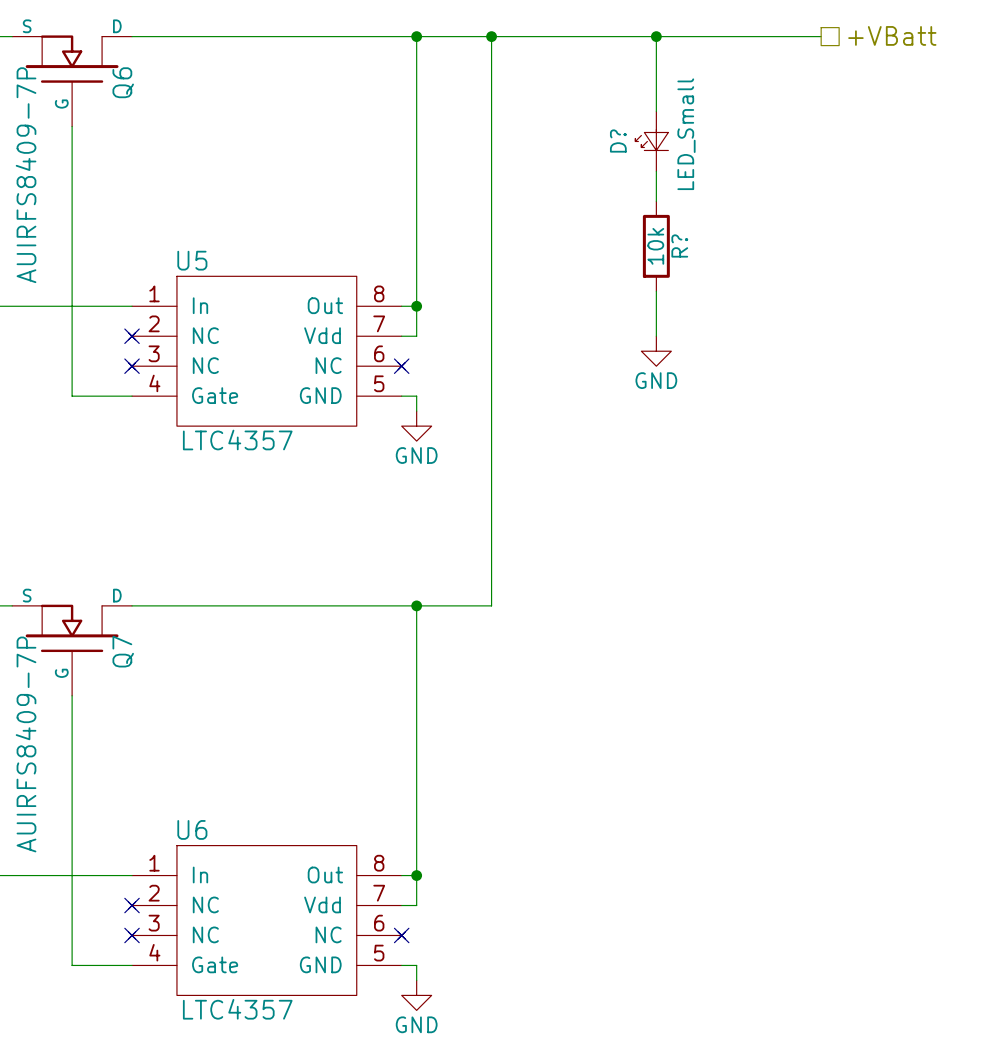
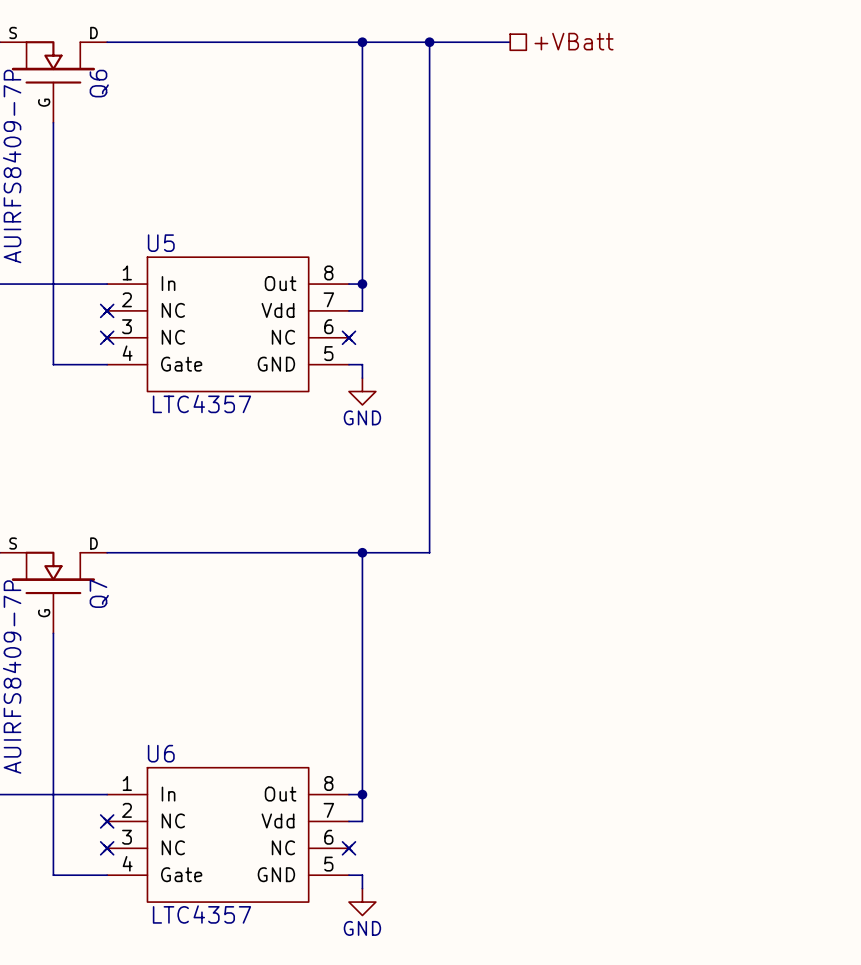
hierarchical label position: +VBatt (892, 35) -> +VBatt (574, 41)
wire: (581, 36) (821, 36) -> none
wire: (656, 36) (656, 111) -> none
junction: (656, 36) -> none
D?: LED_Small (651, 141) -> none
wire: (656, 171) (656, 201) -> none
R?: 10k (656, 246) -> none
wire: (656, 291) (656, 336) -> none
power symbol: GND (656, 351) -> none

